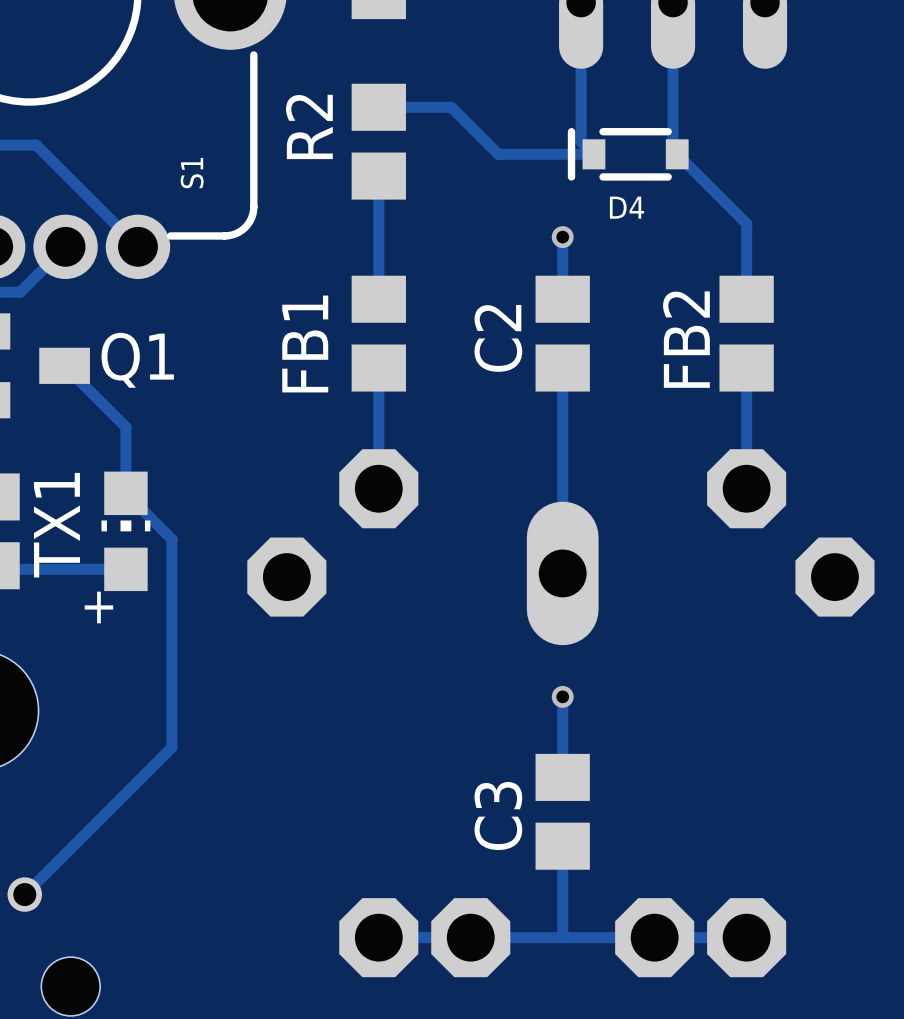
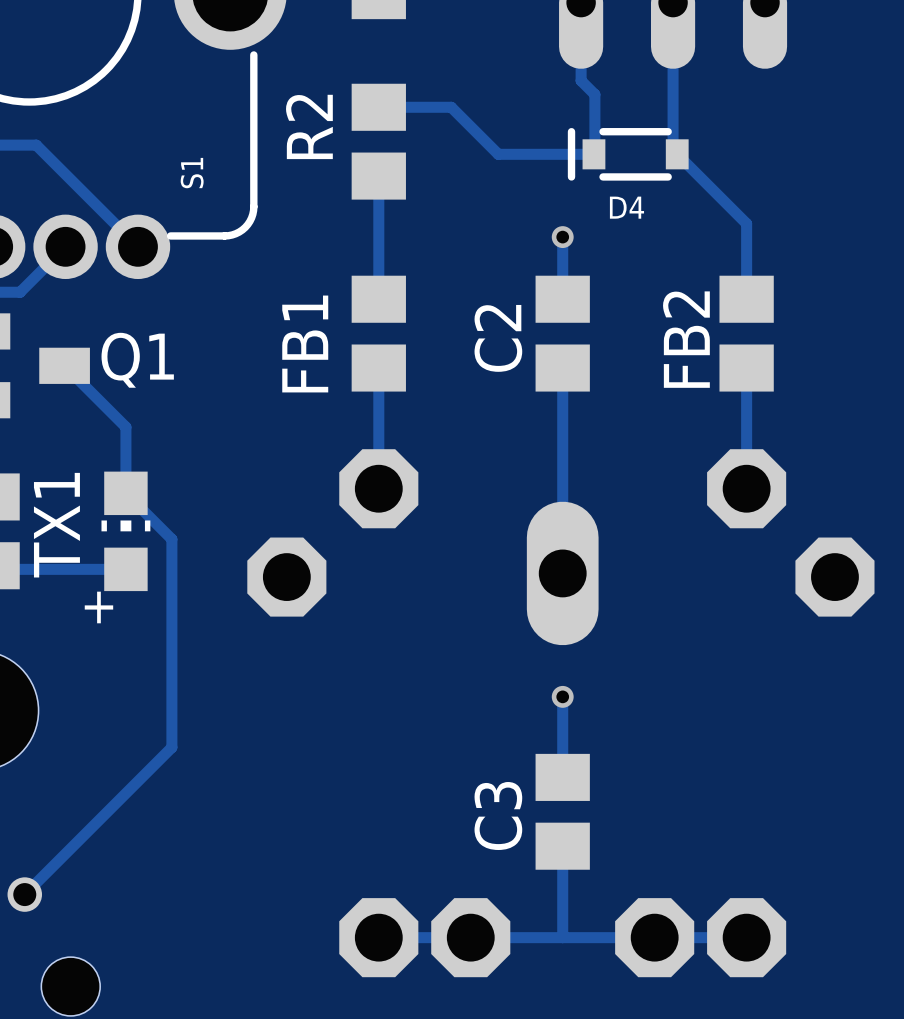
track: (581, 80) (581, 141) (593, 154) -> (581, 80) (594, 94) (593, 154)

